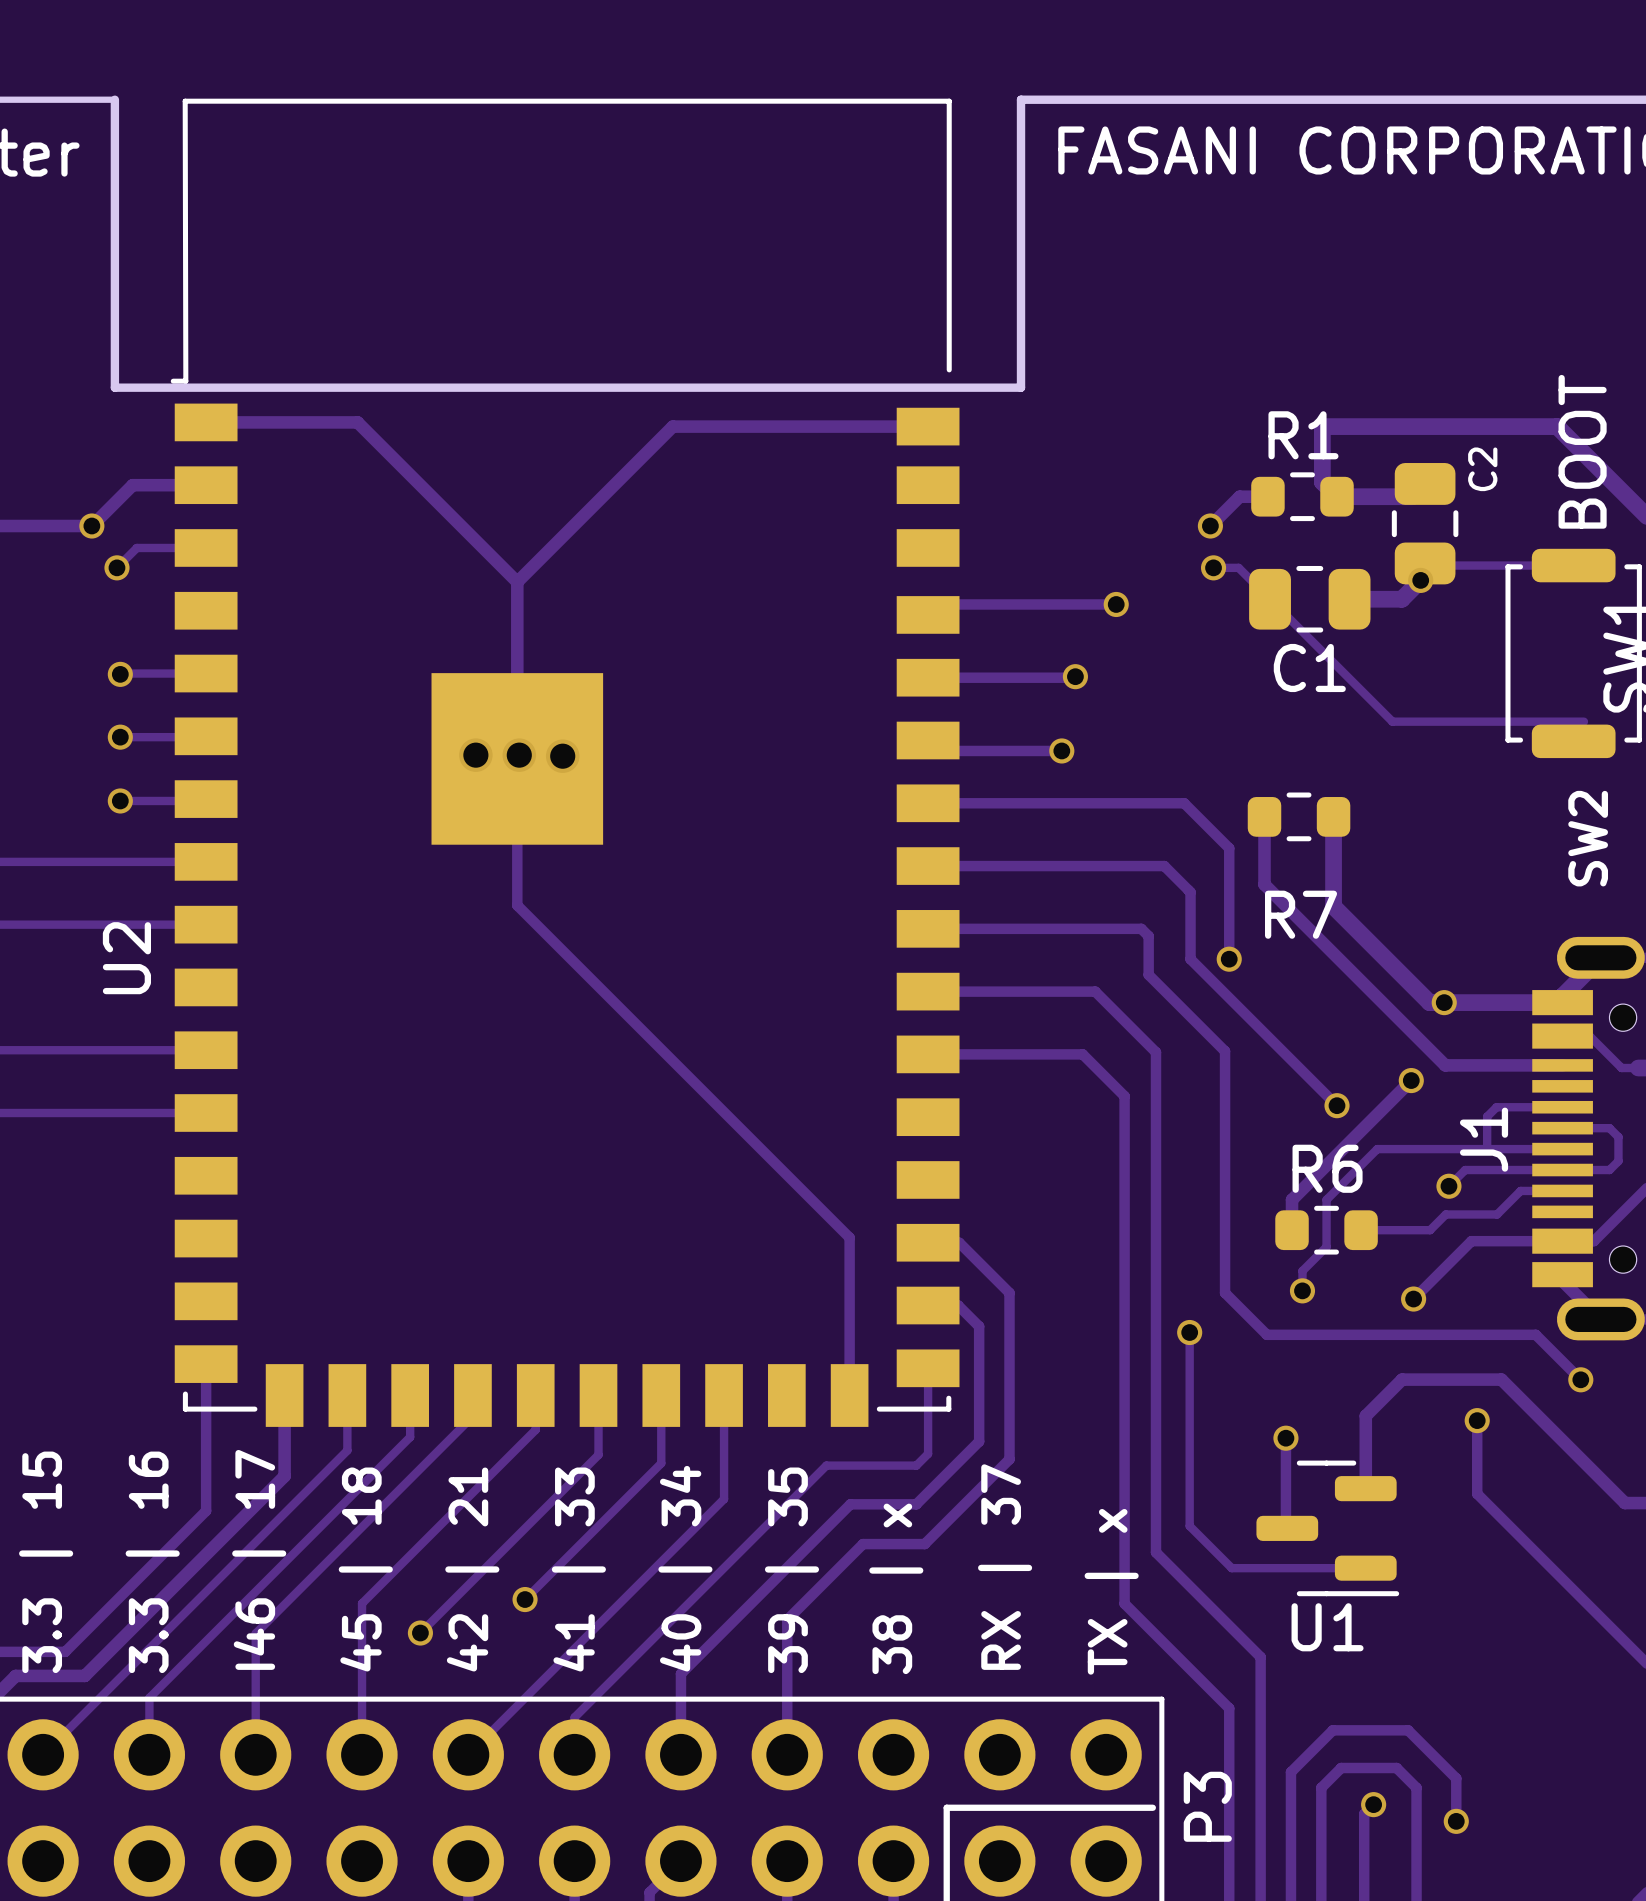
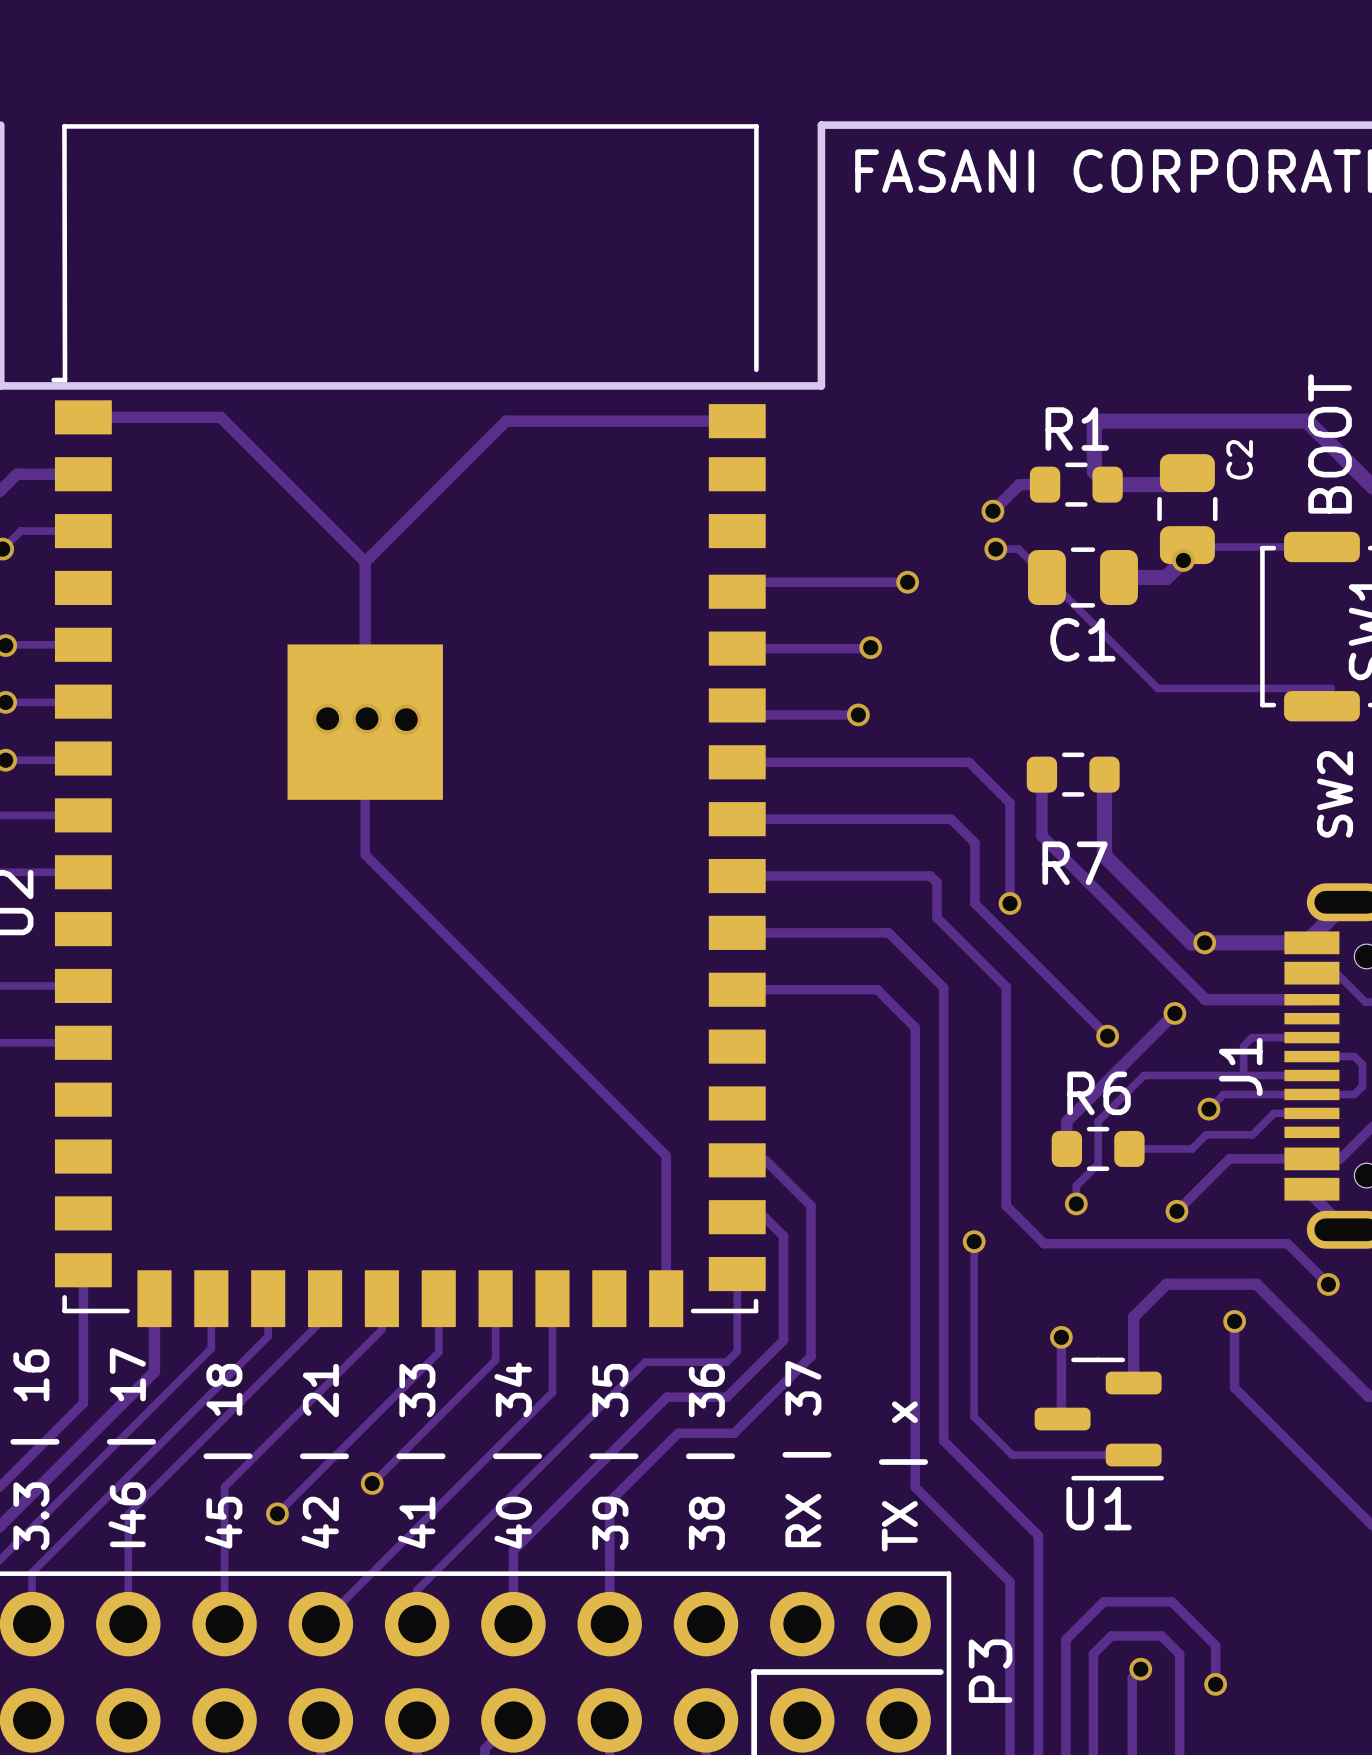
text: 38 | x (896, 1588) -> 38 | 36 (710, 1456)

